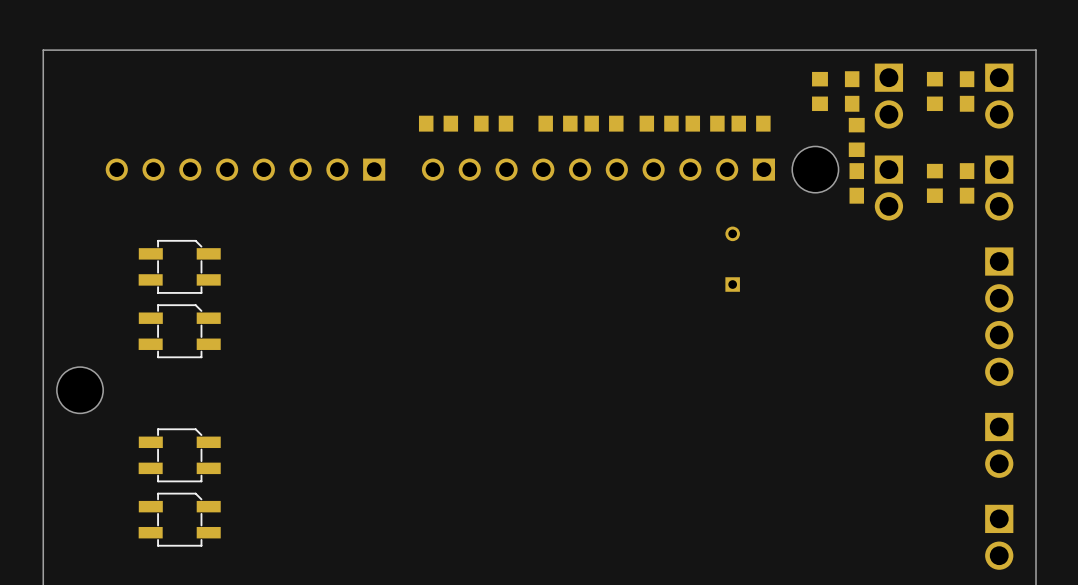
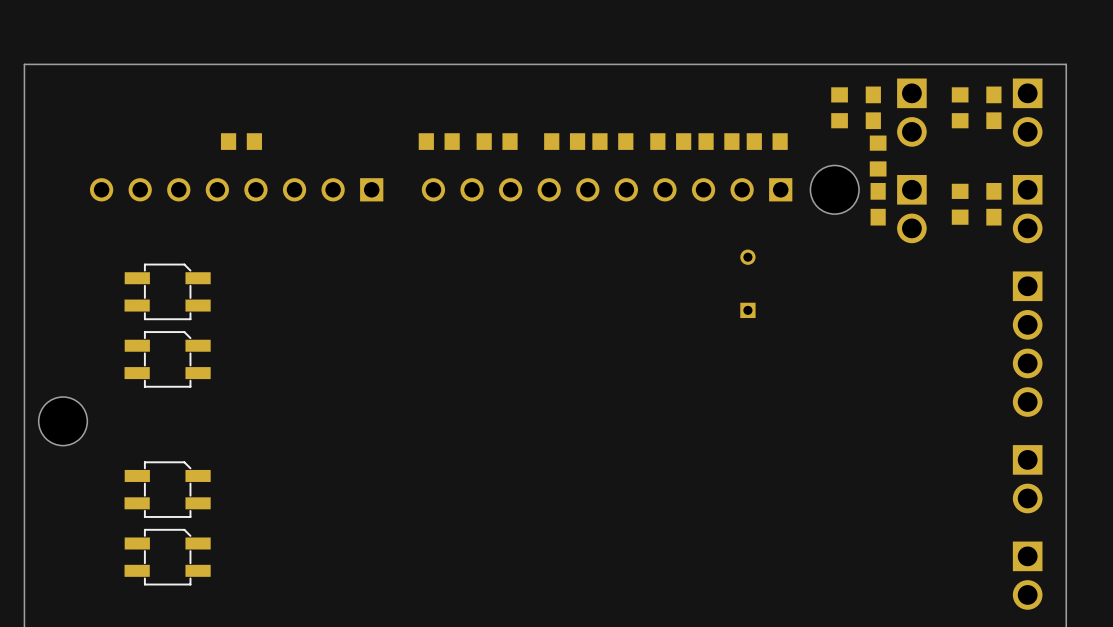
part: none -> (241, 141)

